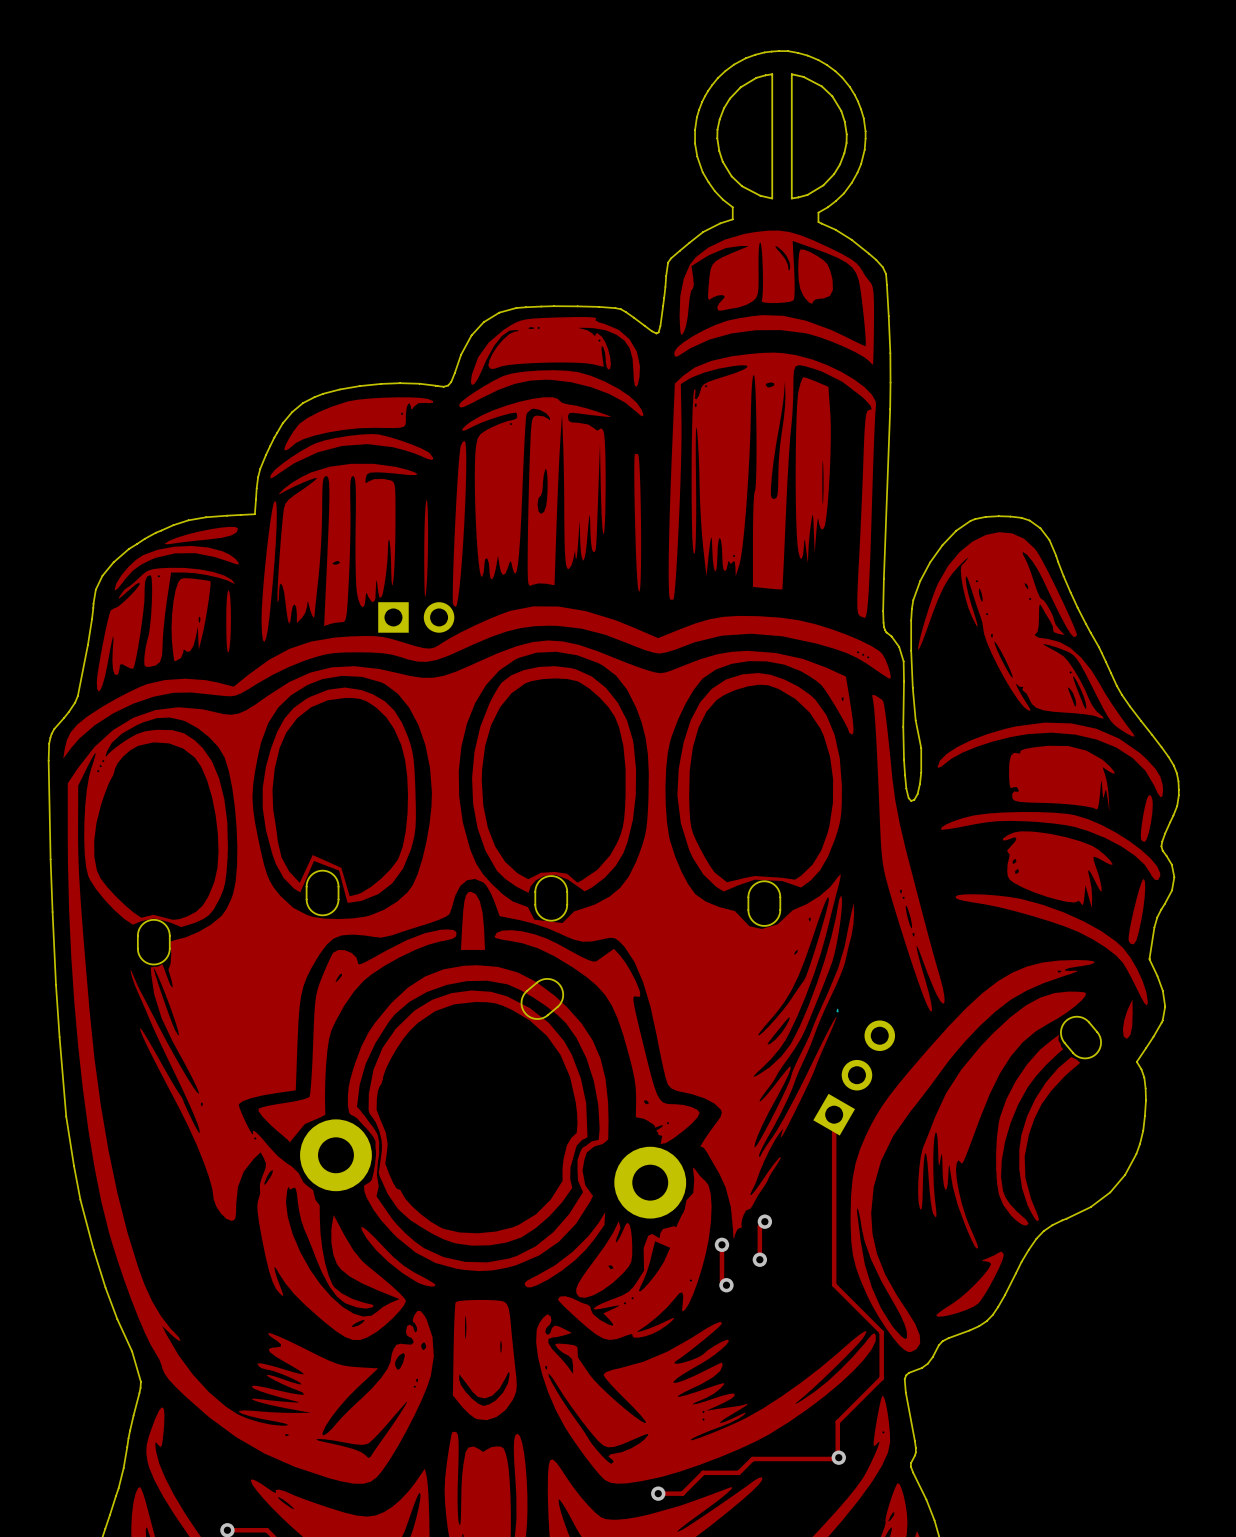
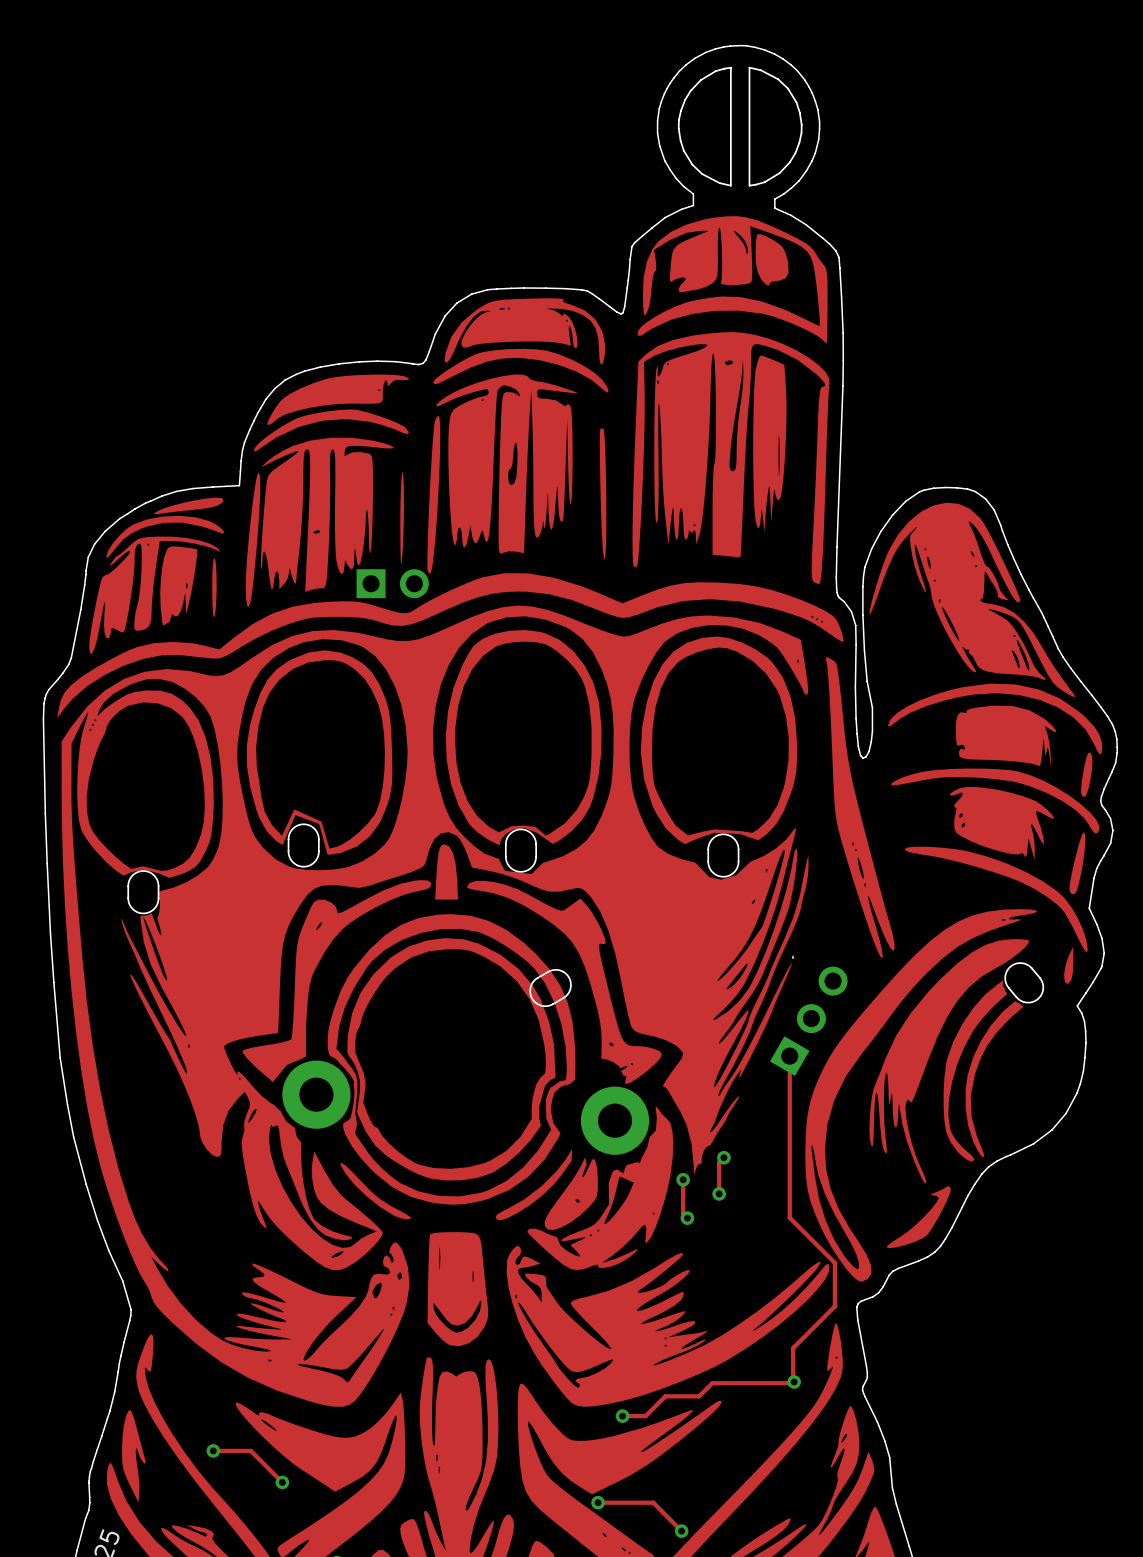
part: (542, 998) -> none
part: none -> (550, 988)

